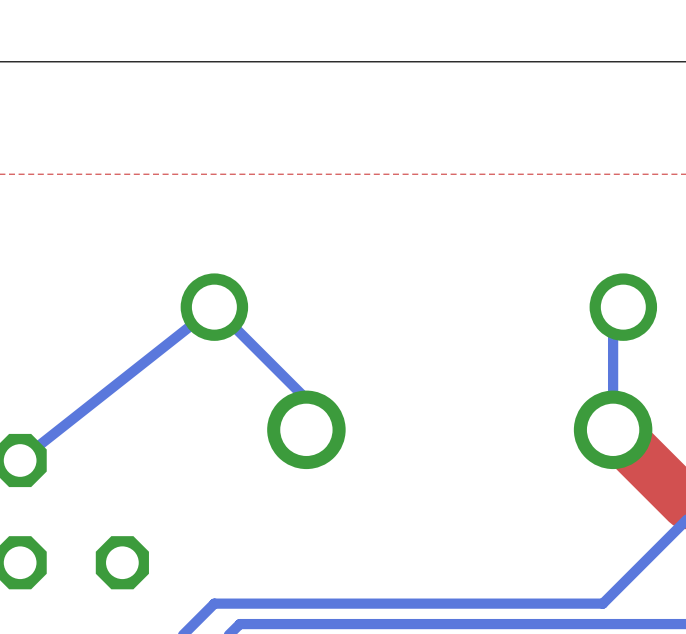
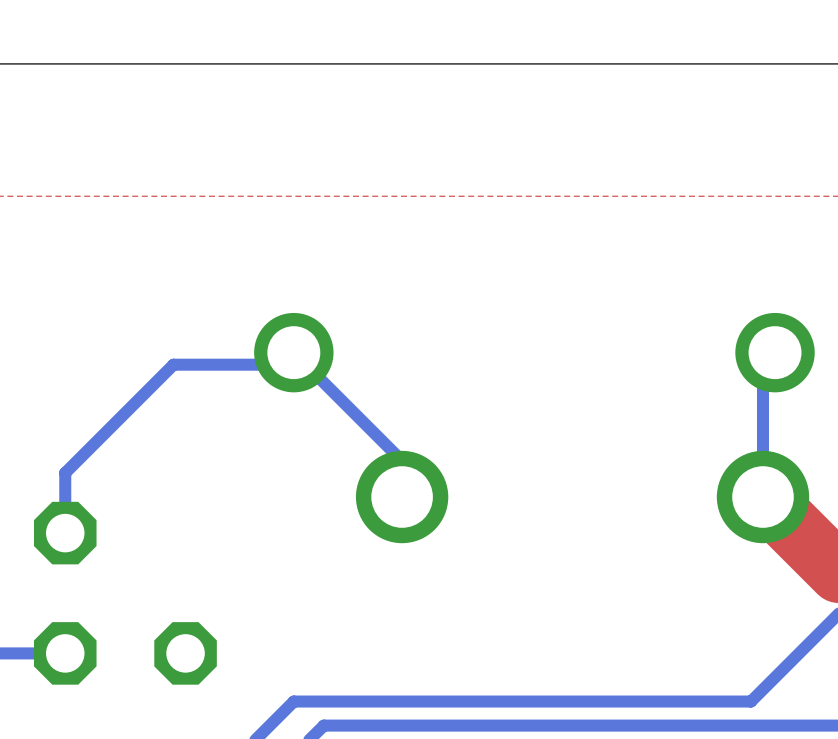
bottom track: (214, 307) (20, 460) -> (293, 352) (281, 364) (173, 364) (65, 472) (65, 533)

